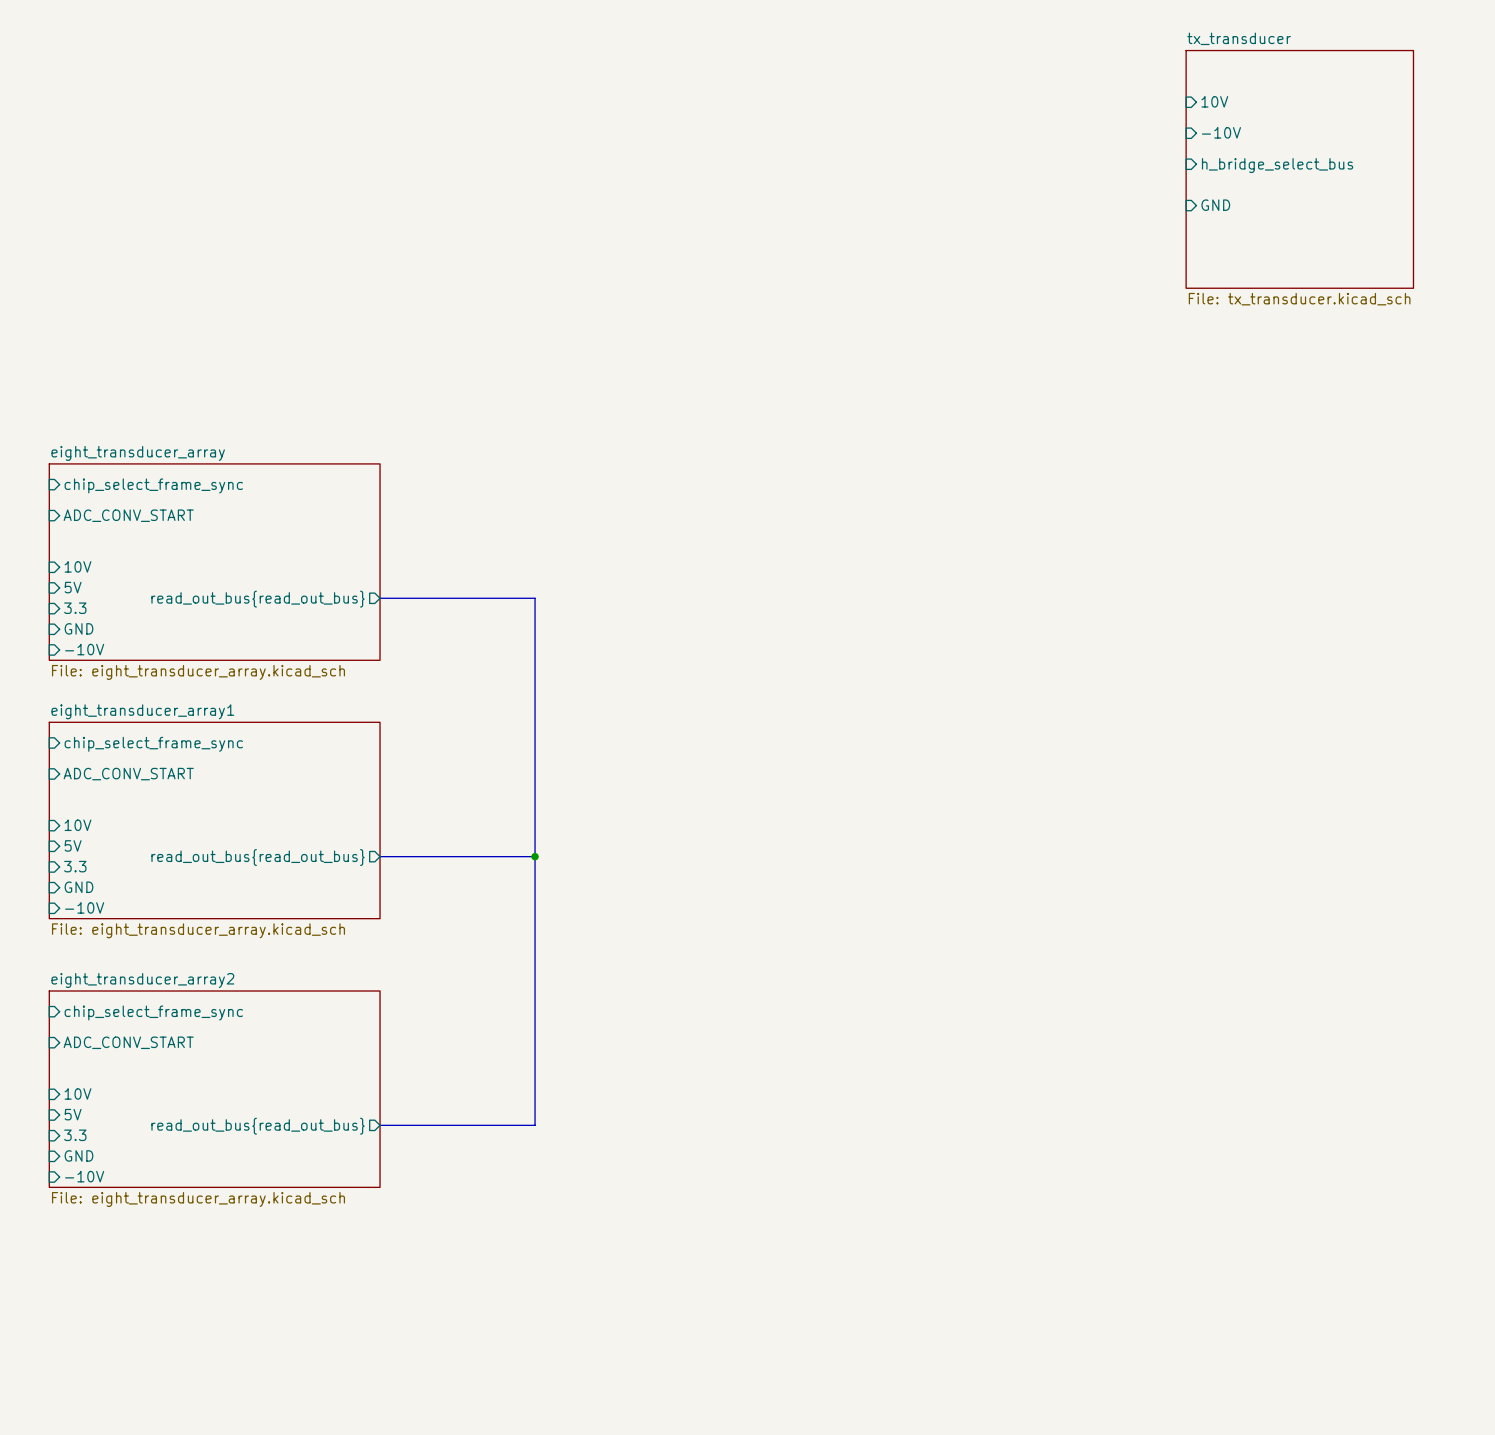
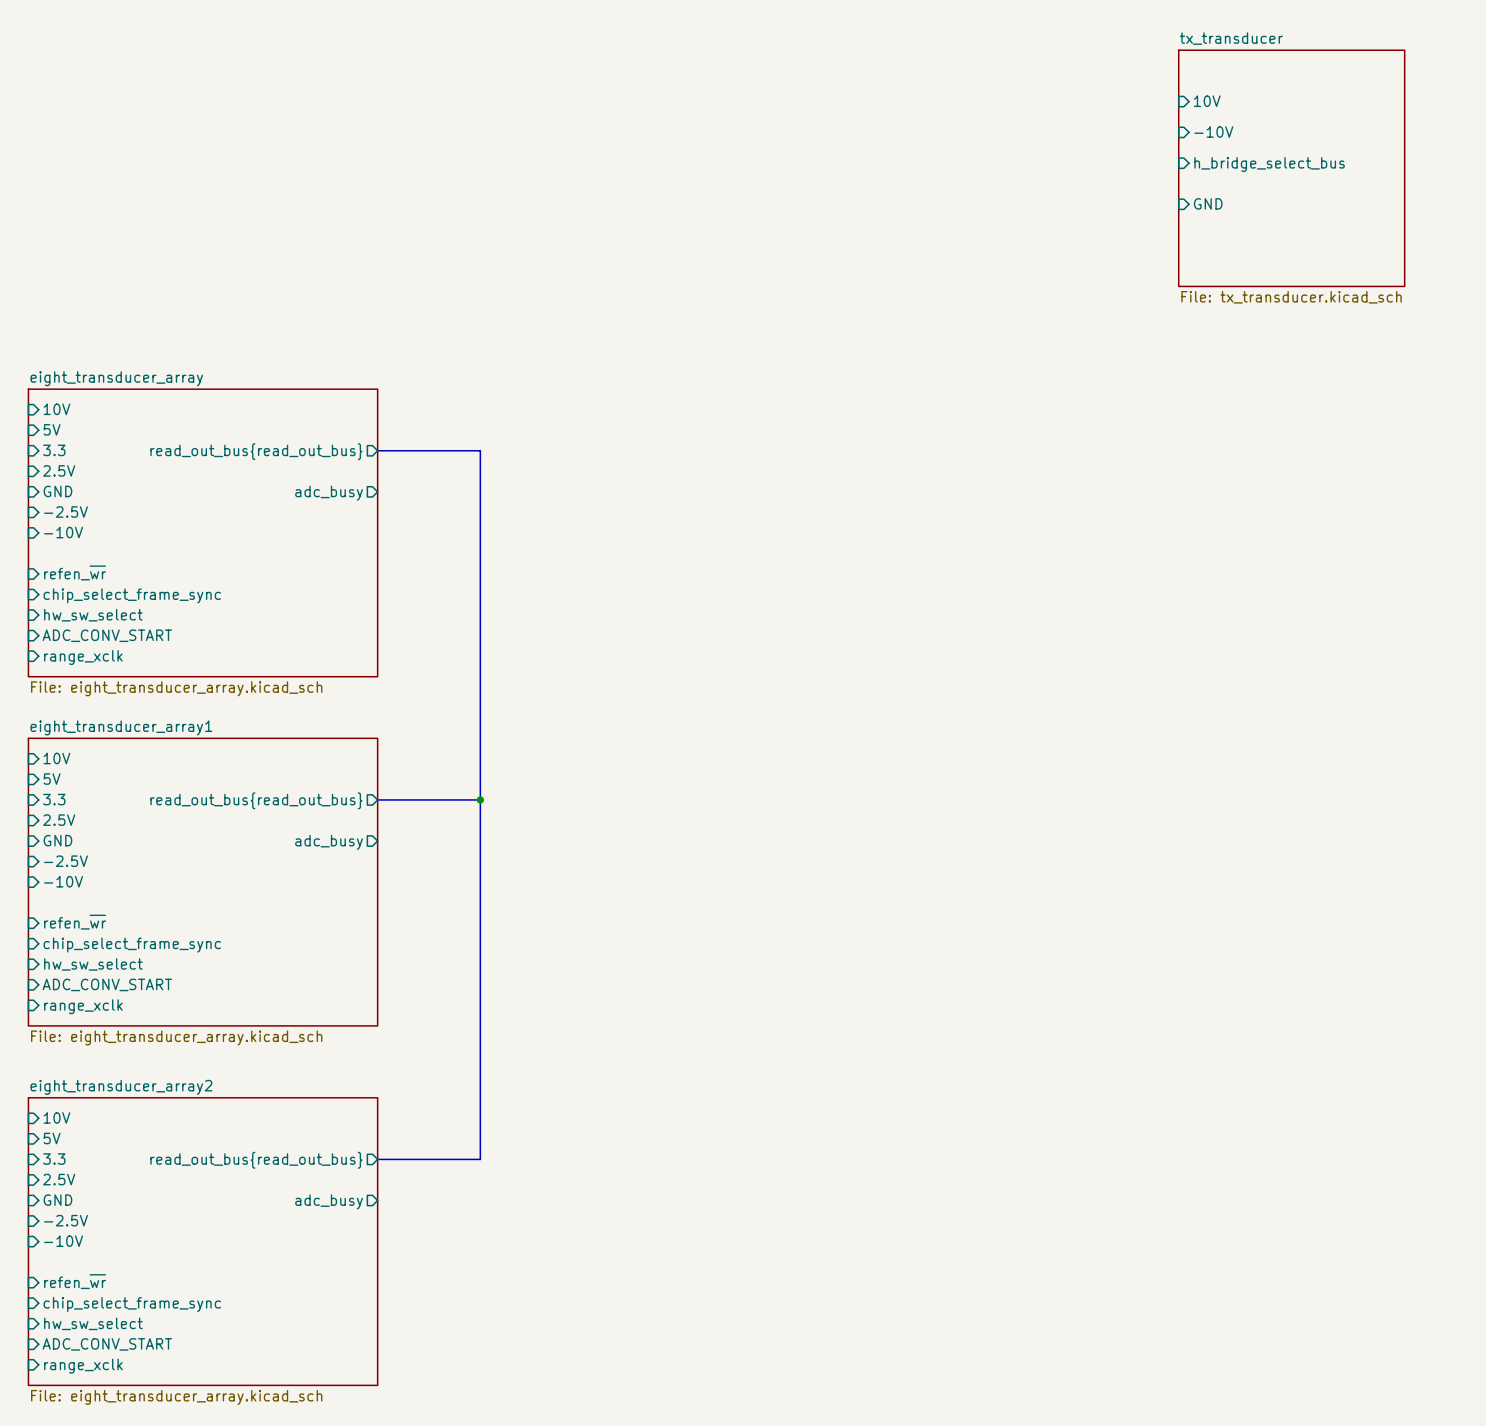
sheet pin: none -> 10V (56, 409)
sheet pin: none -> 5V (52, 429)
sheet pin: none -> 3.3 (54, 450)
bus: none -> (377, 450) (480, 450) (480, 1159) (377, 1159)
sheet pin: none -> read_out_bus{read_out_bus} (256, 451)
sheet pin: none -> 2.5V (59, 470)
sheet pin: chip_select_frame_sync (153, 485) -> none
sheet pin: none -> GND (57, 491)
sheet pin: none -> adc_busy (329, 493)
sheet pin: none -> -2.5V (66, 512)
sheet pin: ADC_CONV_START (128, 515) -> none
sheet eight_transducer_array: none -> File: eight_transducer_array.kicad_sch (203, 532)
sheet eight_transducer_array: File: eight_transducer_array.kicad_sch (214, 562) -> none
sheet pin: 10V (78, 566) -> none
sheet pin: none -> refen_~{wr} (75, 572)
sheet pin: 5V (73, 587) -> none
bus: (380, 598) (535, 598) (535, 1125) (380, 1125) -> none
sheet pin: none -> chip_select_frame_sync (132, 595)
sheet pin: read_out_bus{read_out_bus} (258, 599) -> none
sheet pin: 3.3 (75, 608) -> none
sheet pin: none -> hw_sw_select (93, 615)
sheet pin: GND (78, 628) -> none
sheet pin: none -> ADC_CONV_START (107, 635)
sheet pin position: -10V (84, 649) -> -10V (63, 532)
sheet pin: none -> range_xclk (83, 657)
sheet eight_transducer_array1 name position: eight_transducer_array1 (142, 711) -> eight_transducer_array1 (121, 727)
sheet eight_transducer_array1 shape: [48, 721, 381, 920] -> [27, 737, 379, 1027]
sheet pin: chip_select_frame_sync (153, 744) -> none
sheet pin: ADC_CONV_START (128, 774) -> none
bus: none -> (377, 799) (480, 799)
junction: none -> (480, 799)
sheet pin: none -> 2.5V (59, 820)
sheet pin position: 10V (78, 825) -> 10V (56, 758)
sheet pin position: 5V (73, 845) -> 5V (52, 779)
sheet pin: none -> adc_busy (329, 842)
bus: (380, 856) (535, 856) -> none
junction: (535, 856) -> none
sheet pin position: read_out_bus{read_out_bus} (258, 857) -> read_out_bus{read_out_bus} (256, 800)
sheet pin: none -> -2.5V (66, 861)
sheet pin position: 3.3 (75, 866) -> 3.3 (54, 799)
sheet pin position: GND (78, 887) -> GND (57, 840)
sheet pin position: -10V (84, 907) -> -10V (63, 881)
sheet pin: none -> refen_~{wr} (75, 922)
sheet eight_transducer_array1 value position: File: eight_transducer_array.kicad_sch (198, 930) -> File: eight_transducer_array.kicad_sch (176, 1037)
sheet pin: none -> hw_sw_select (93, 964)
sheet eight_transducer_array2 name position: eight_transducer_array2 (142, 980) -> eight_transducer_array2 (121, 1087)
sheet eight_transducer_array2 shape: [48, 990, 381, 1188] -> [27, 1097, 379, 1386]
sheet pin: none -> range_xclk (83, 1006)
sheet pin position: chip_select_frame_sync (153, 1013) -> chip_select_frame_sync (132, 945)
sheet pin position: ADC_CONV_START (128, 1042) -> ADC_CONV_START (107, 984)
sheet pin position: 10V (78, 1093) -> 10V (56, 1117)
sheet pin position: 5V (73, 1114) -> 5V (52, 1138)
sheet pin position: read_out_bus{read_out_bus} (258, 1126) -> read_out_bus{read_out_bus} (256, 1160)
sheet pin position: 3.3 (75, 1135) -> 3.3 (54, 1159)
sheet pin position: GND (78, 1155) -> GND (57, 1200)
sheet pin position: -10V (84, 1176) -> -10V (63, 1241)
sheet pin: none -> 2.5V (59, 1179)
sheet eight_transducer_array2 value position: File: eight_transducer_array.kicad_sch (198, 1199) -> File: eight_transducer_array.kicad_sch (176, 1397)
sheet pin: none -> adc_busy (329, 1201)
sheet pin: none -> -2.5V (66, 1220)
sheet pin: none -> refen_~{wr} (75, 1281)
sheet pin: none -> chip_select_frame_sync (132, 1304)
sheet pin: none -> hw_sw_select (93, 1323)
sheet pin: none -> ADC_CONV_START (107, 1344)
sheet pin: none -> range_xclk (83, 1366)

